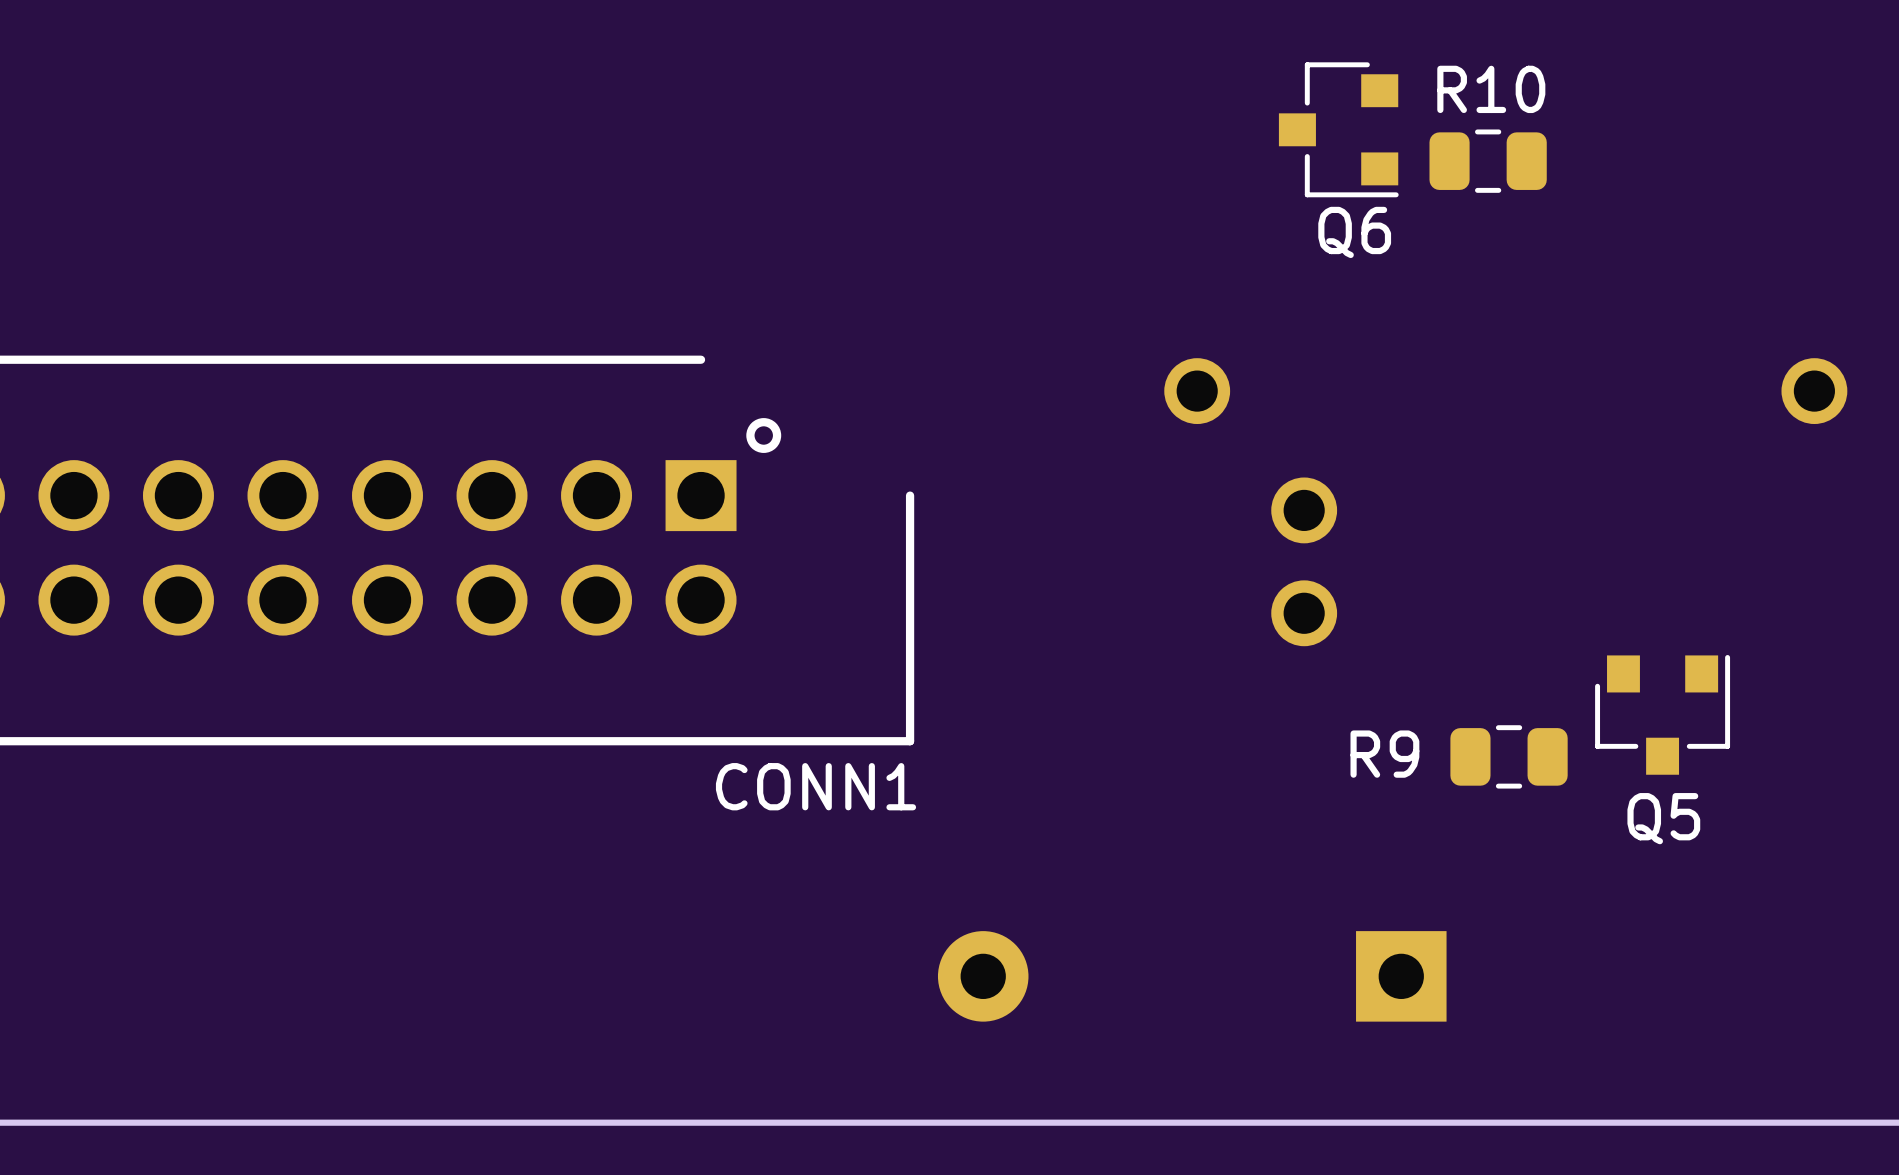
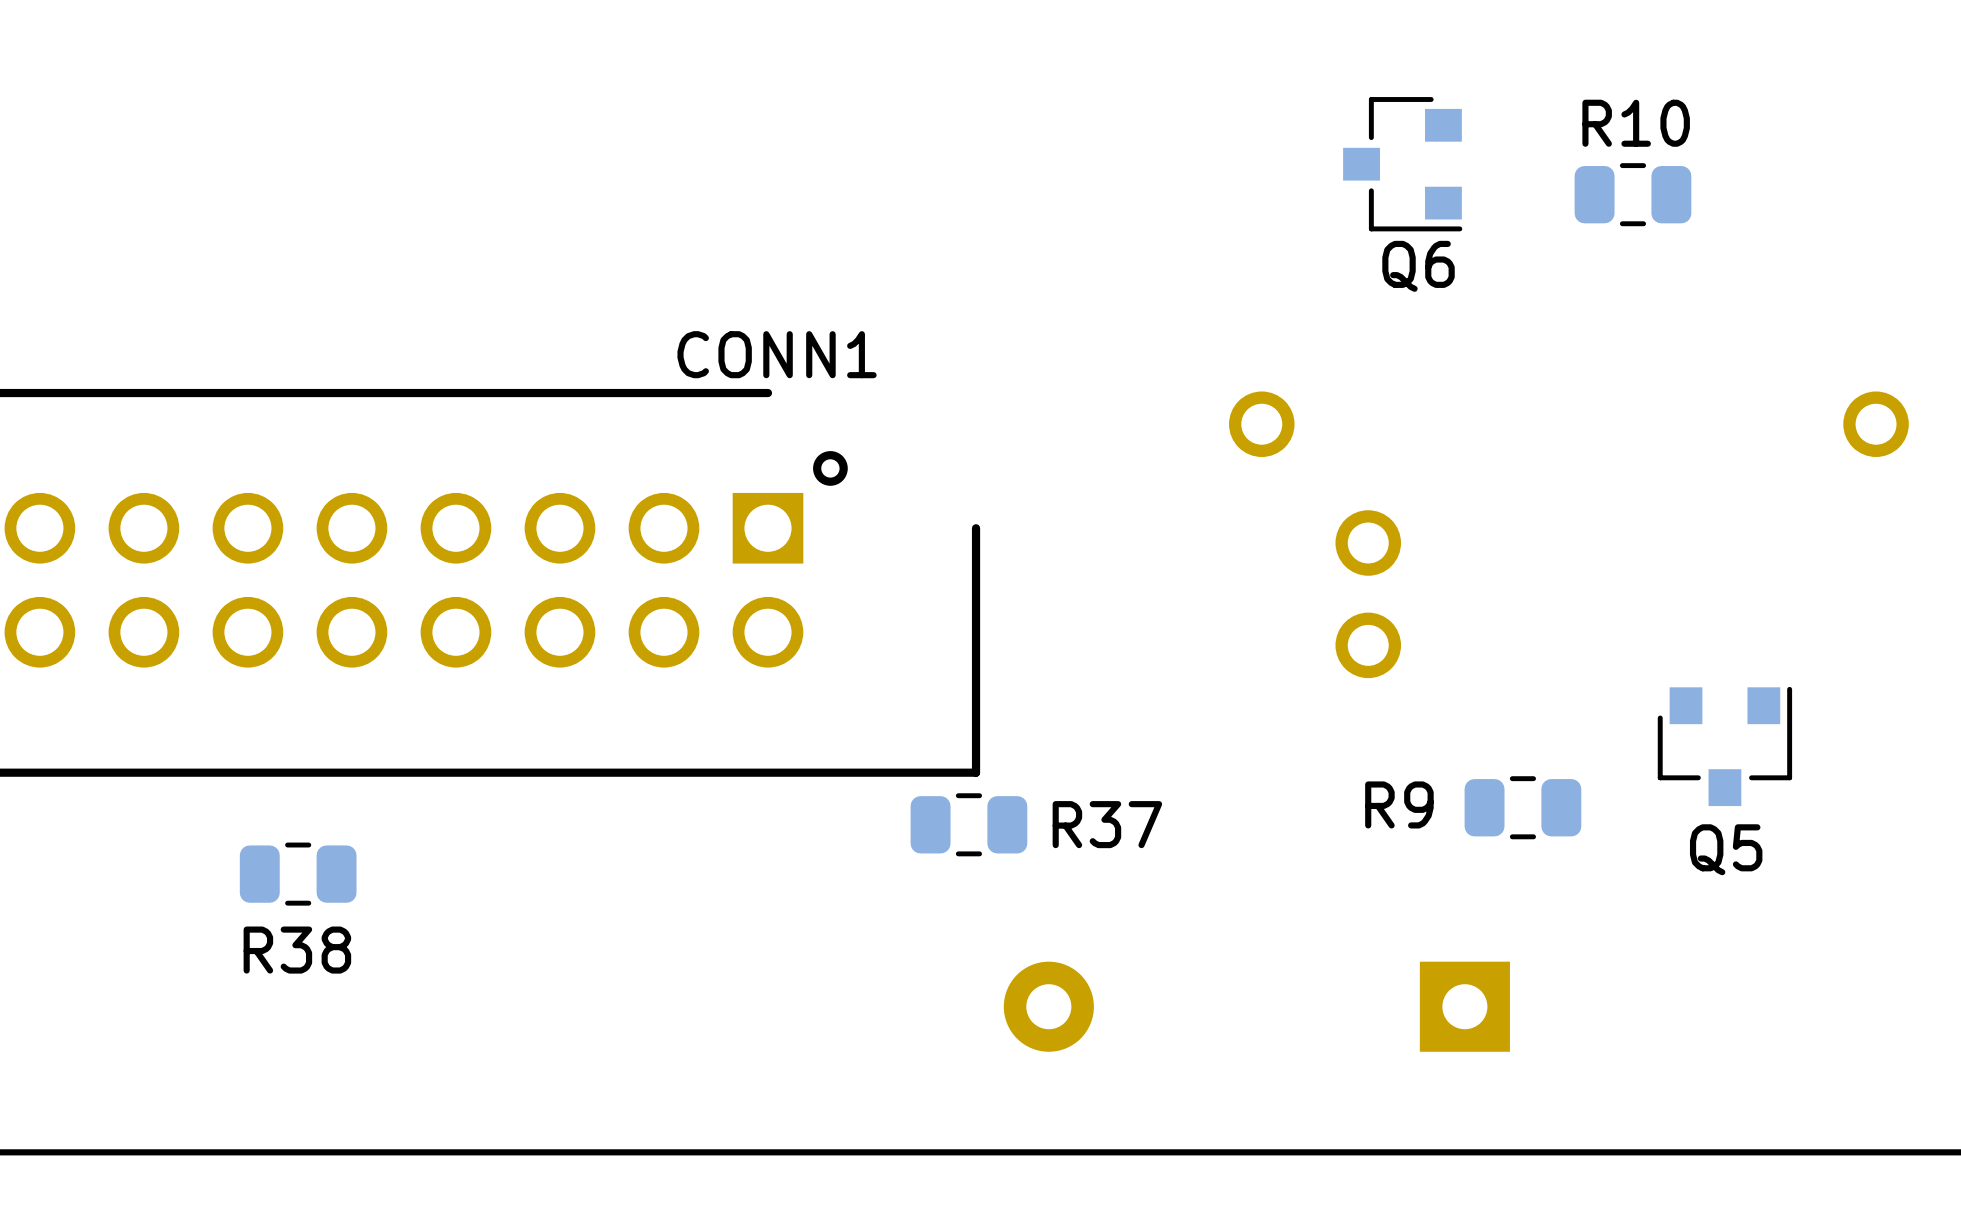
R10 position: (1488, 161) -> (1632, 194)
R9 position: (1509, 756) -> (1522, 807)
CONN1 name position: CONN1 (816, 786) -> CONN1 (777, 354)
R37: none -> (968, 824)
R38: none -> (298, 874)

